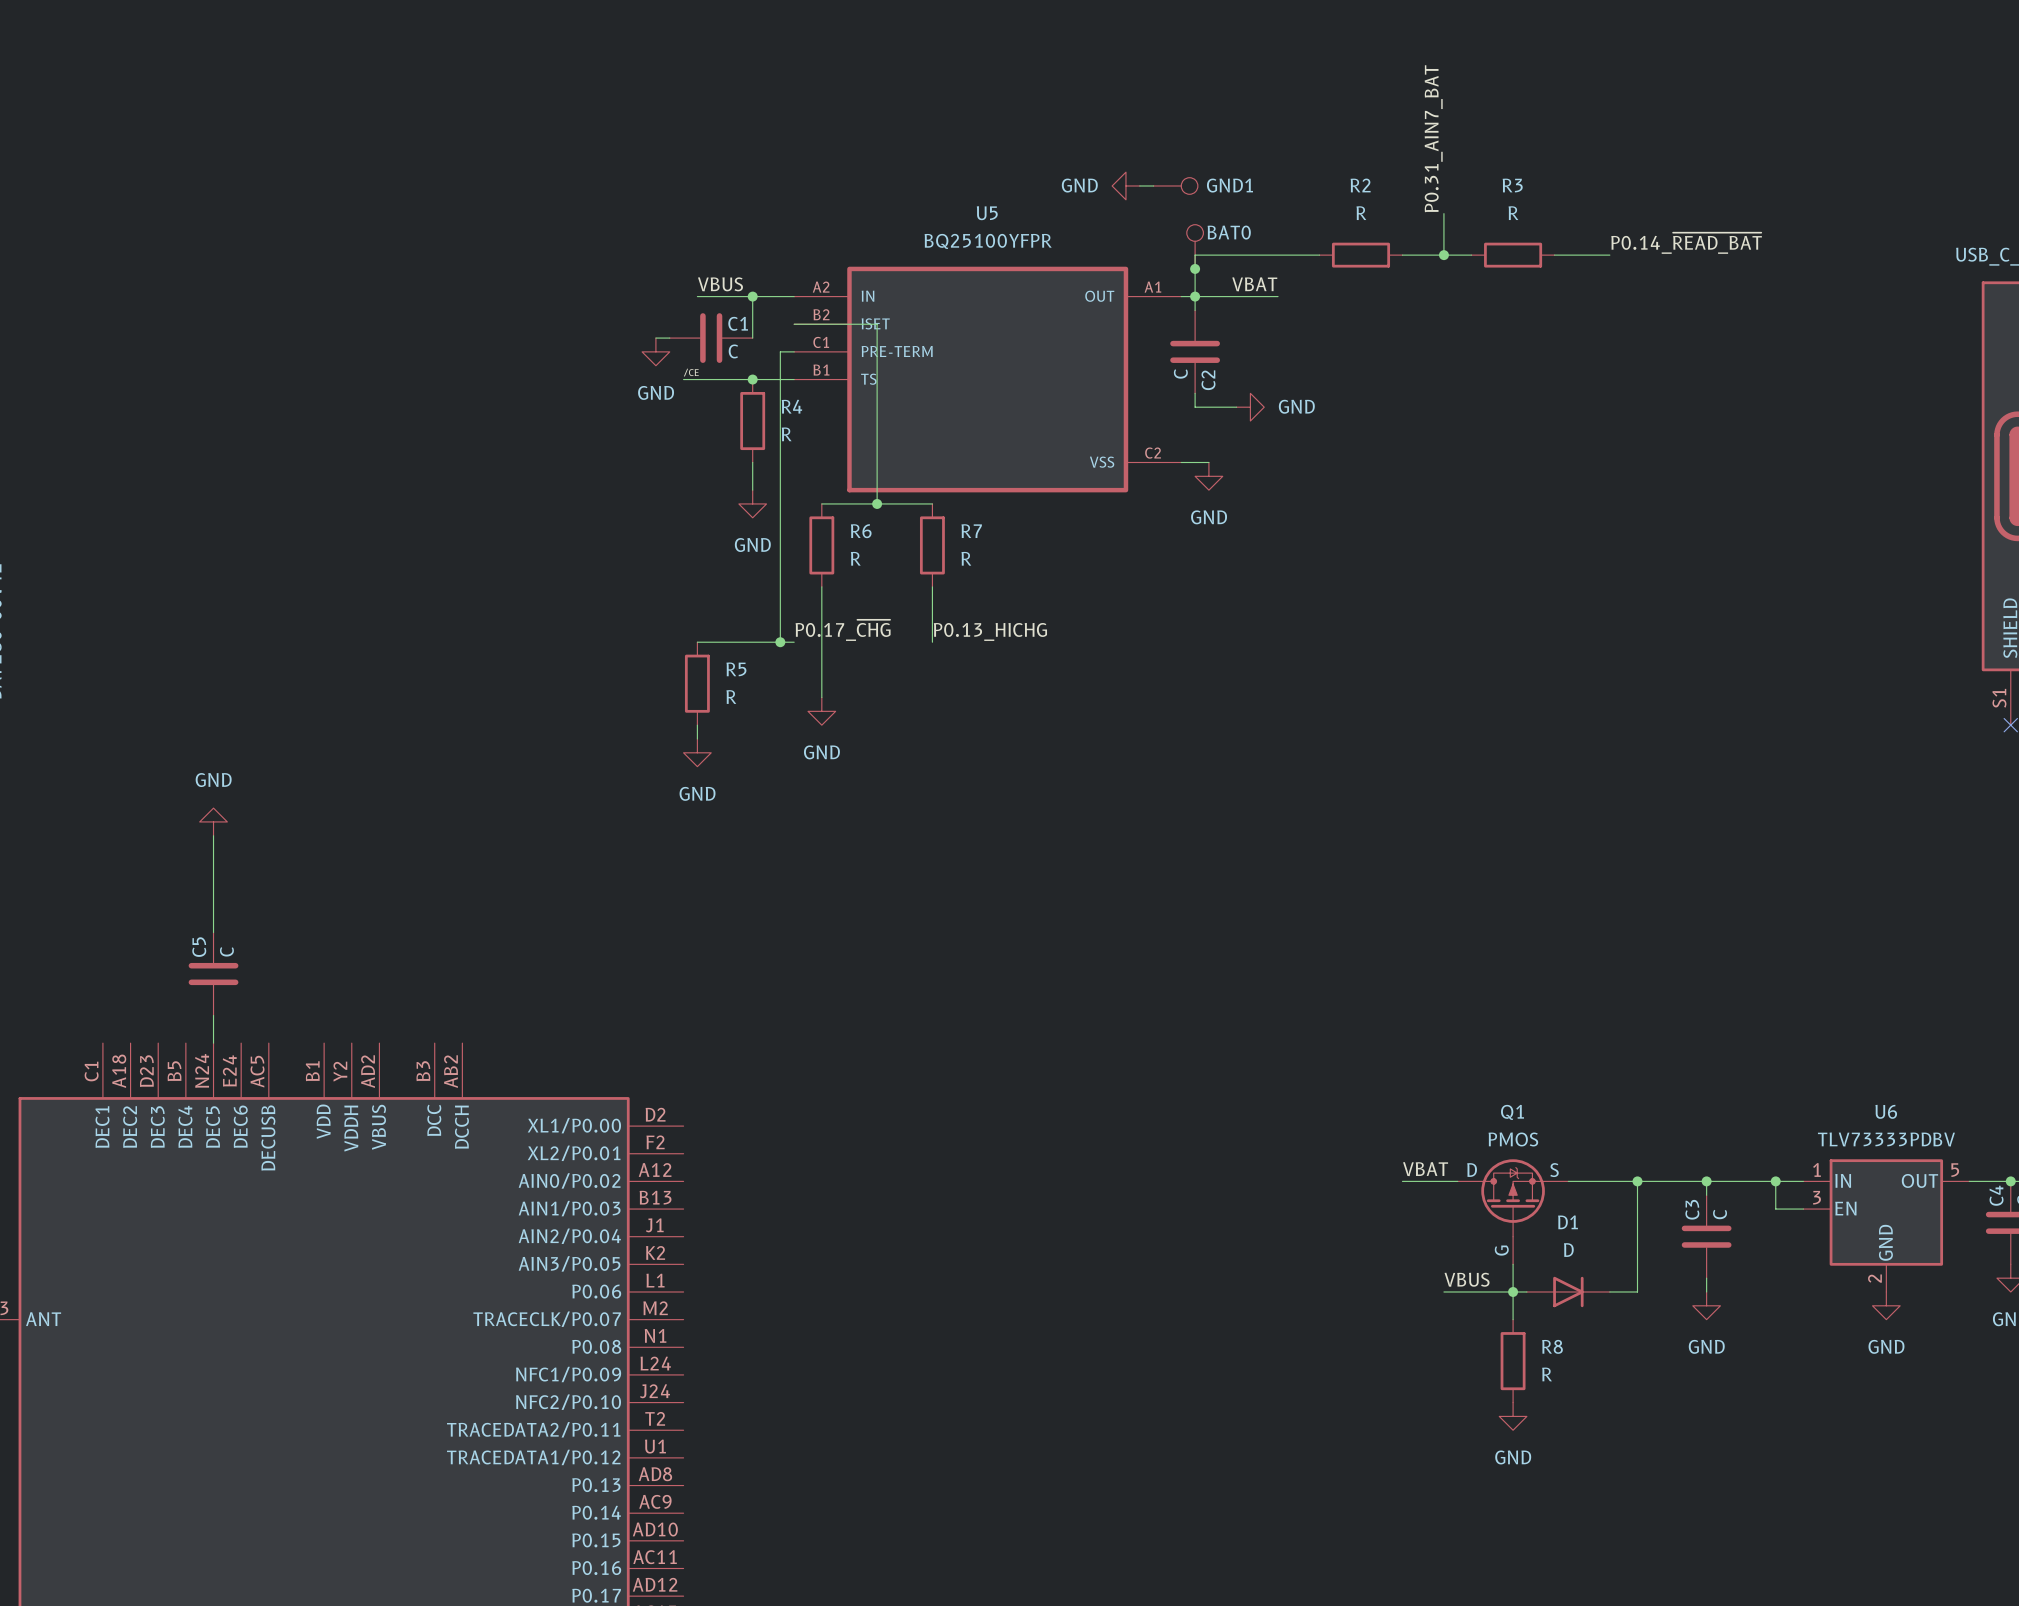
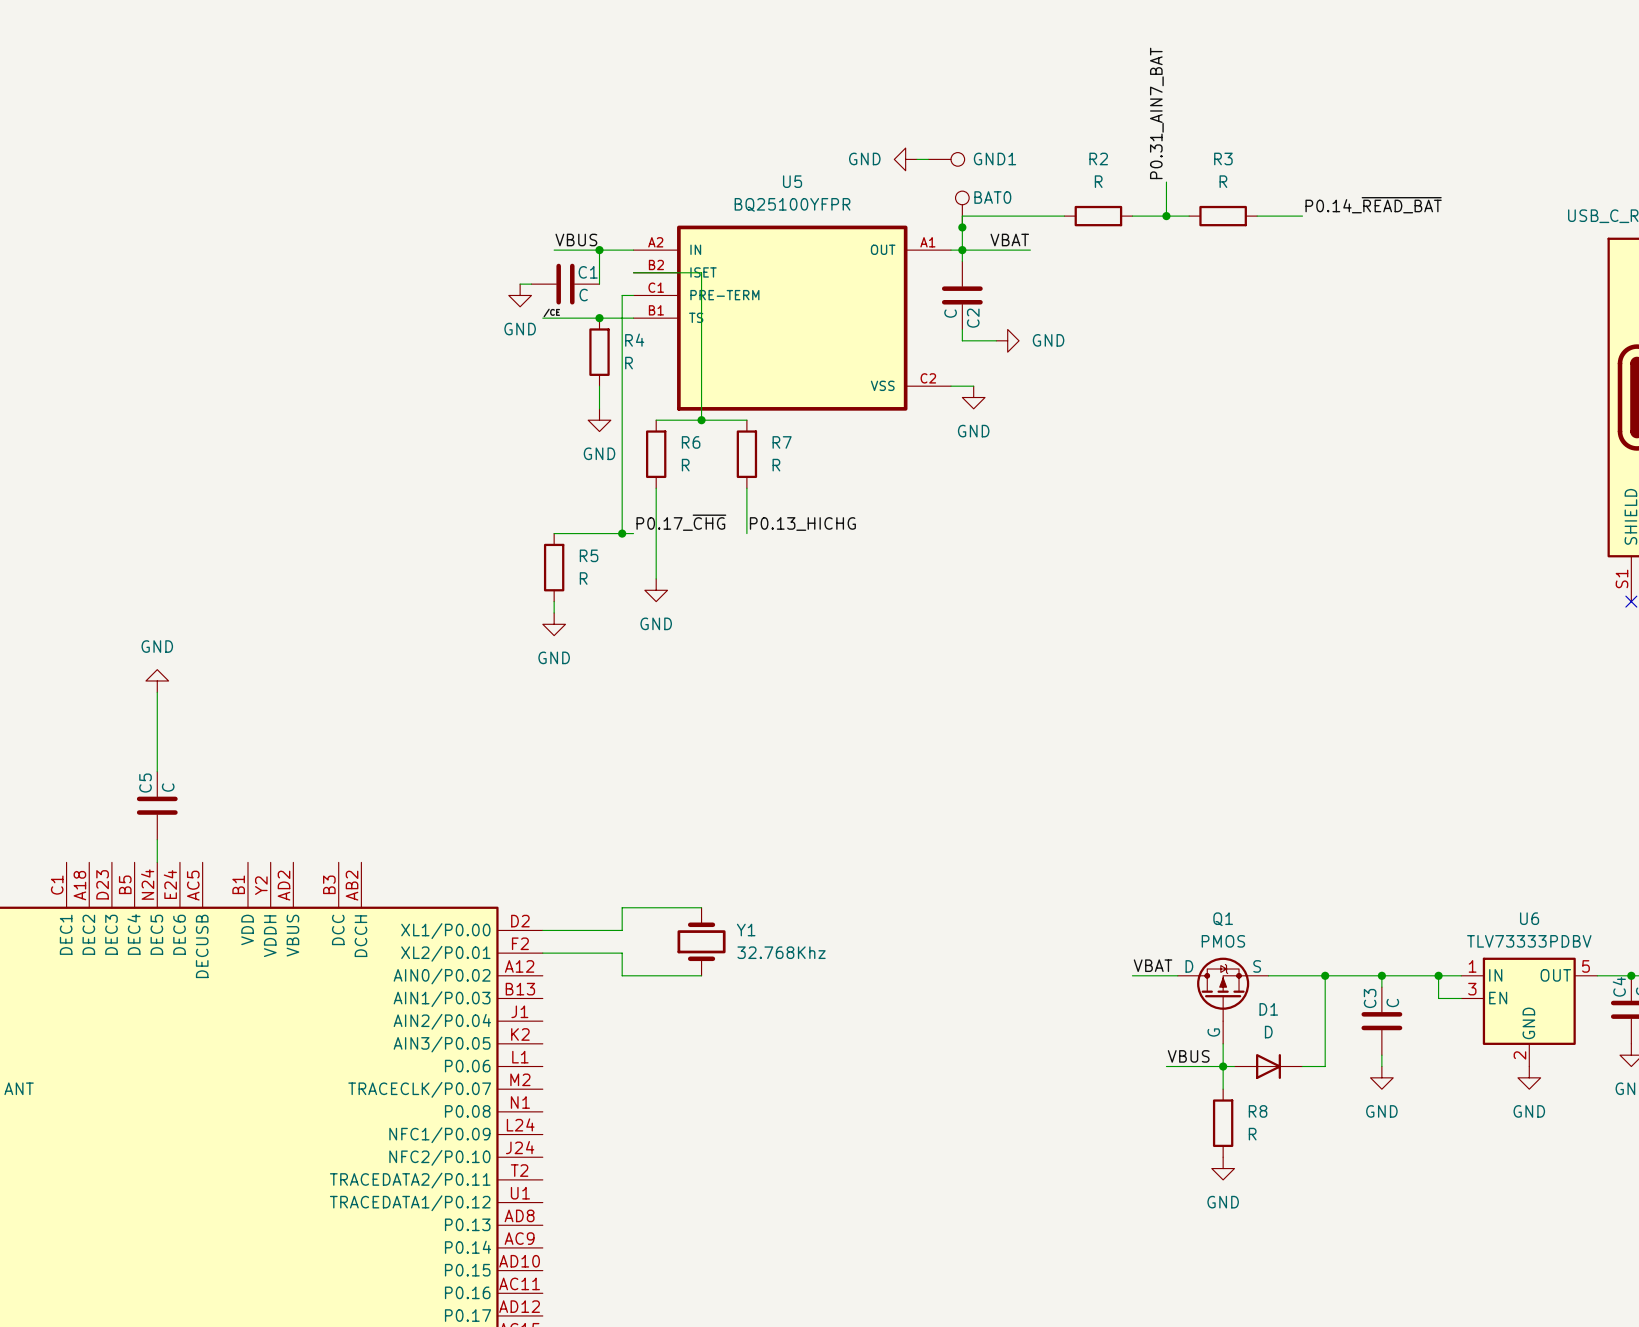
wire: none -> (701, 907) (622, 907) (622, 930) (542, 930)
Y1: none -> 32.768Khz (701, 941)
wire: none -> (542, 953) (622, 953) (622, 975) (701, 975)

